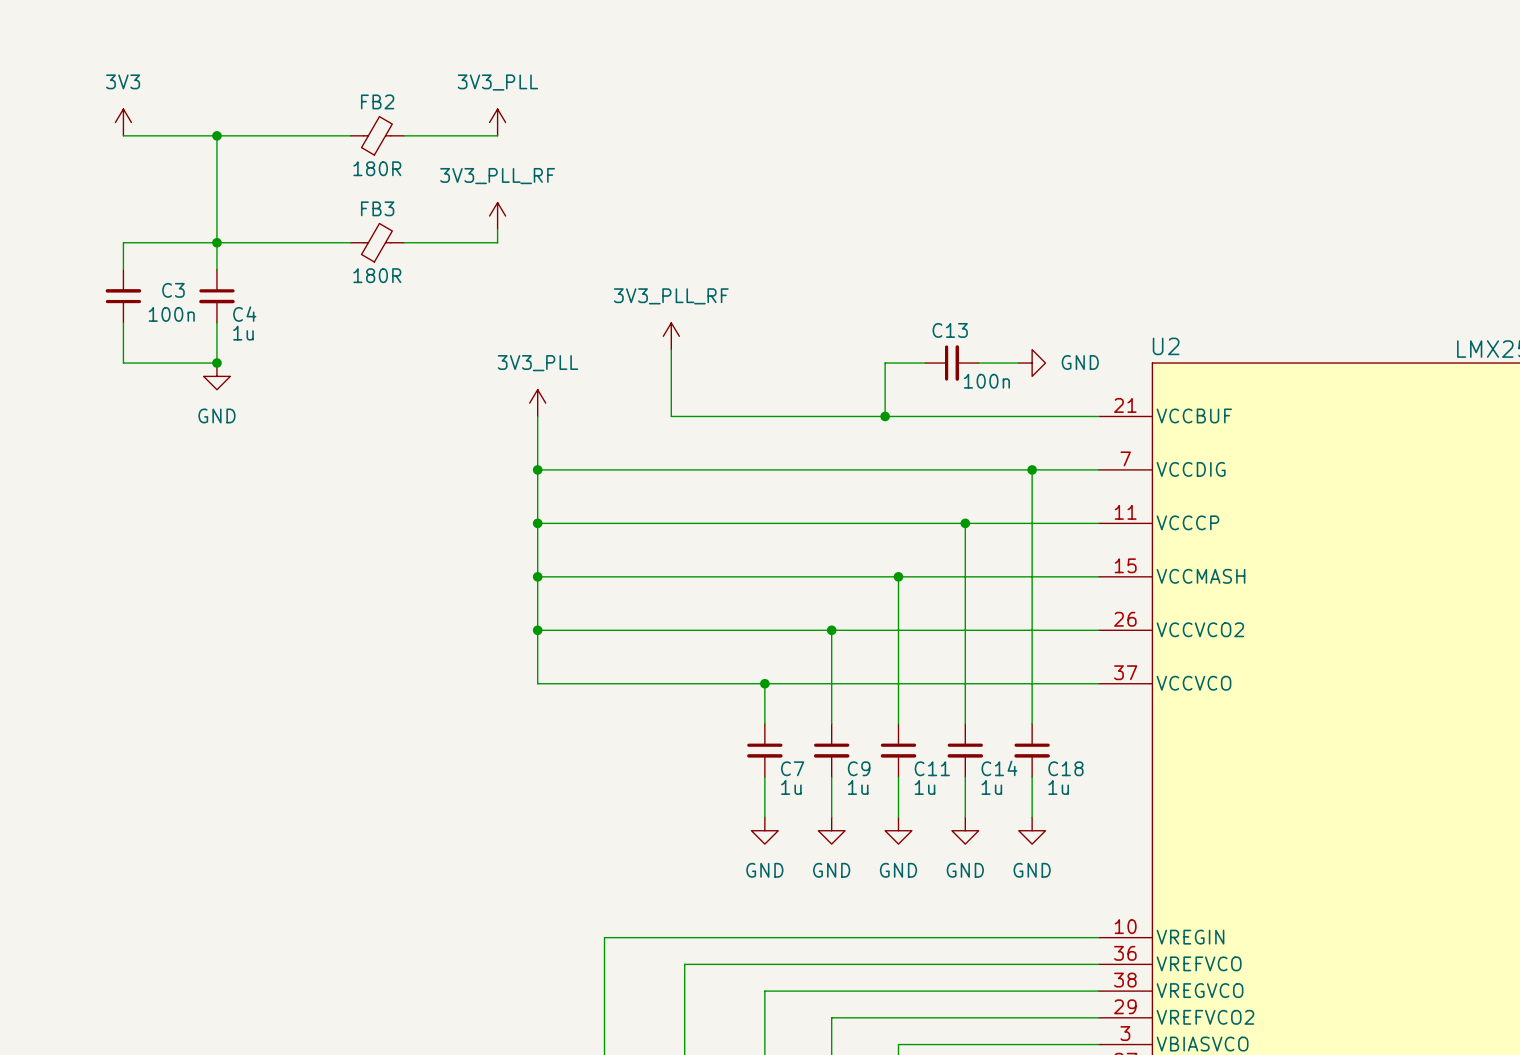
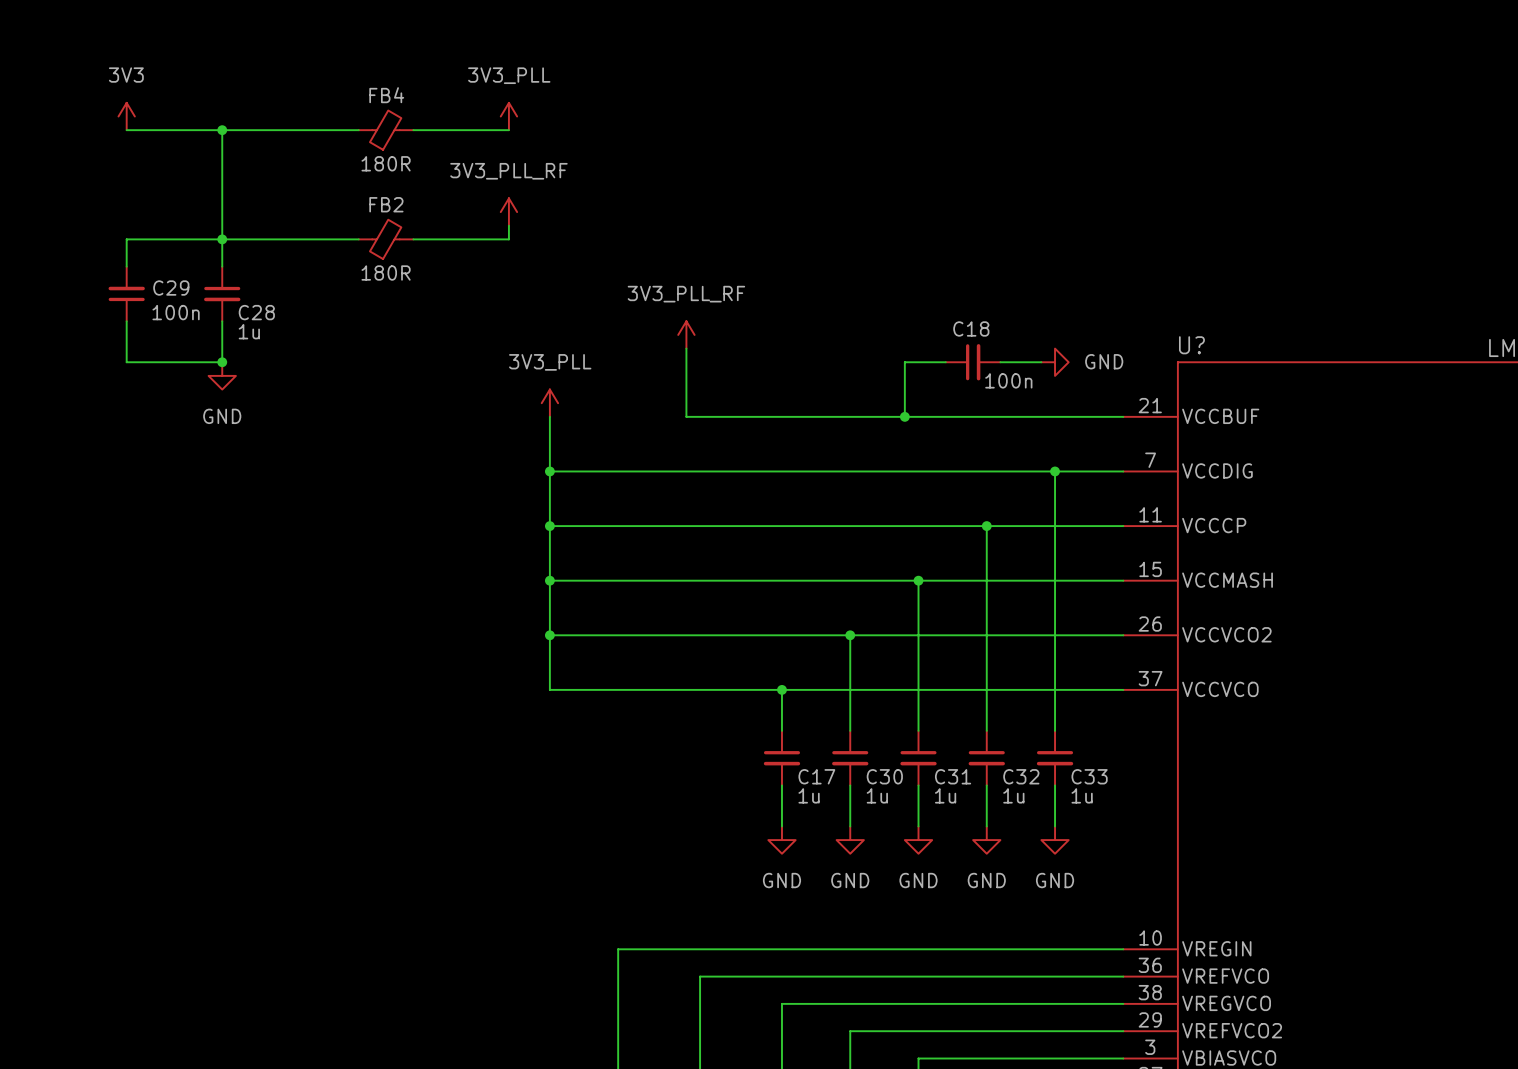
FB2 name: FB2 (377, 101) -> FB4 (386, 95)
FB3 name: FB3 (377, 208) -> FB2 (386, 204)
C3 name: C3 (173, 290) -> C29 (171, 288)
C4 name: C4 (244, 314) -> C28 (256, 312)
C13 name: C13 (950, 330) -> C18 (971, 328)
U2 name: U2 (1166, 346) -> U? (1191, 345)
C7 name: C7 (792, 768) -> C17 (816, 776)
C9 name: C9 (859, 768) -> C30 (884, 776)
C11 name: C11 (932, 768) -> C31 (953, 776)
C14 name: C14 (999, 768) -> C32 (1021, 776)
C18 name: C18 (1065, 768) -> C33 (1089, 776)

